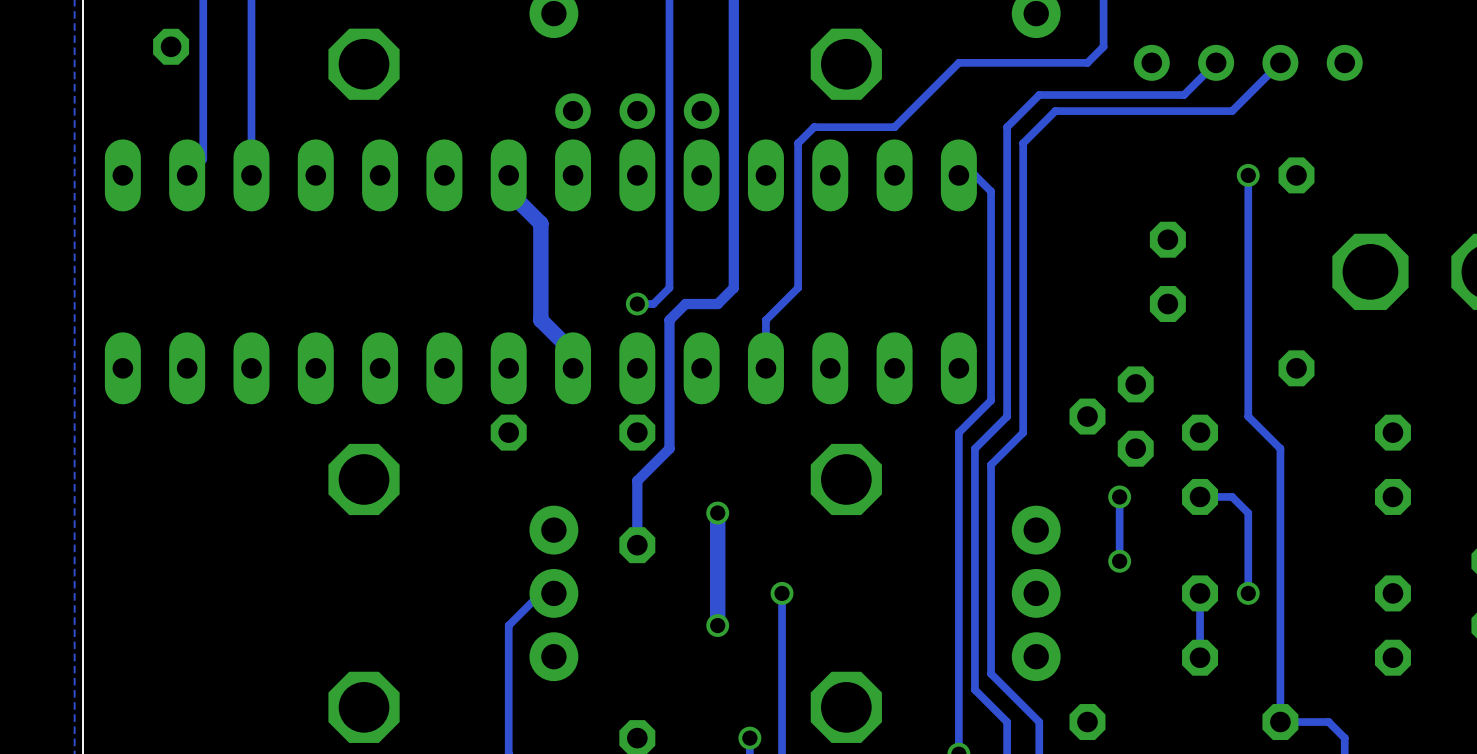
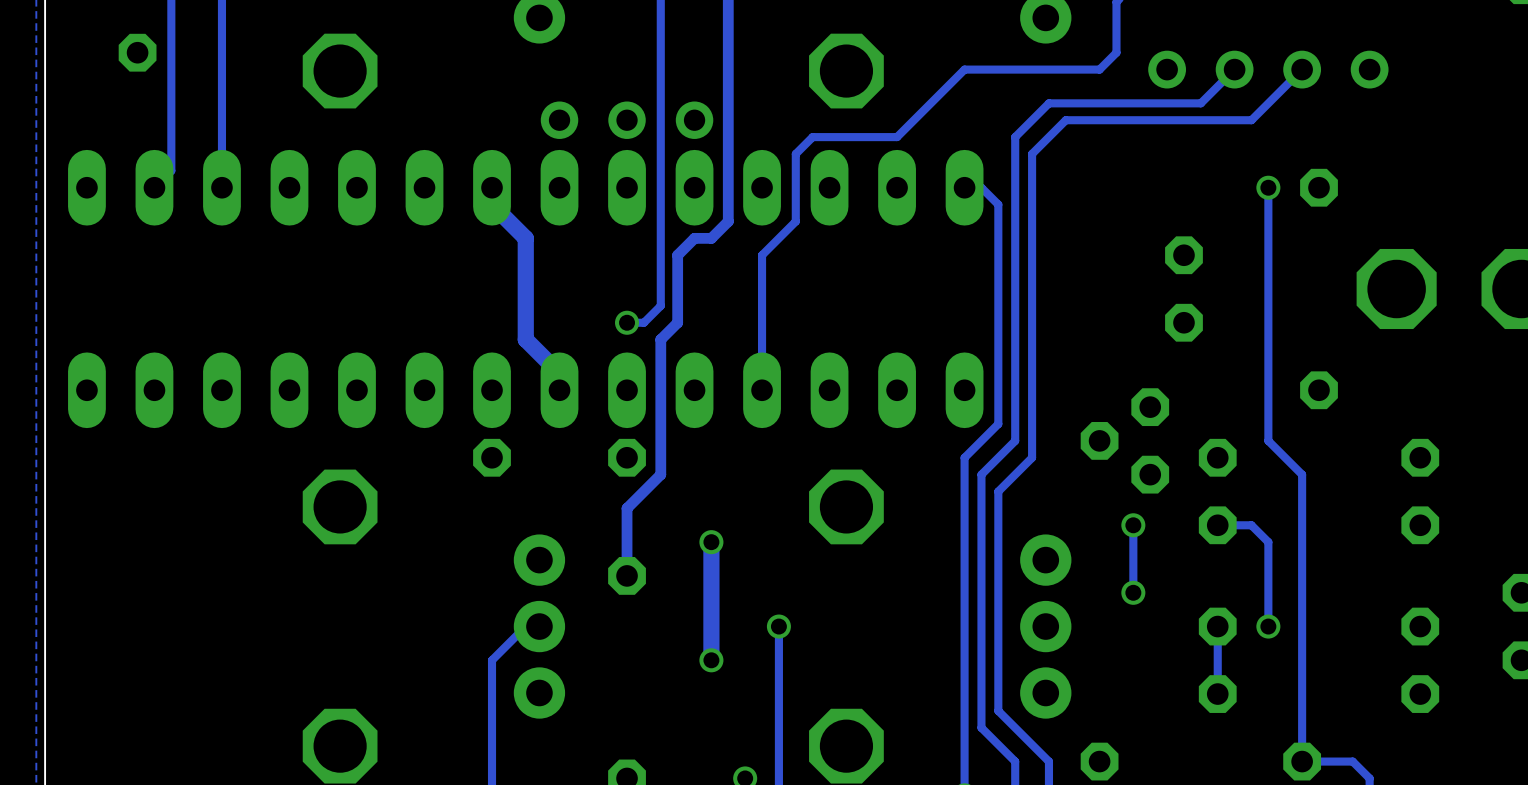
track: (733, 207) (733, 287) (717, 304) (685, 304) -> (728, 221) (711, 238) (694, 238) (677, 255) (677, 322)
track: (798, 207) (798, 287) (765, 320) -> (795, 221) (762, 255) (762, 339)

